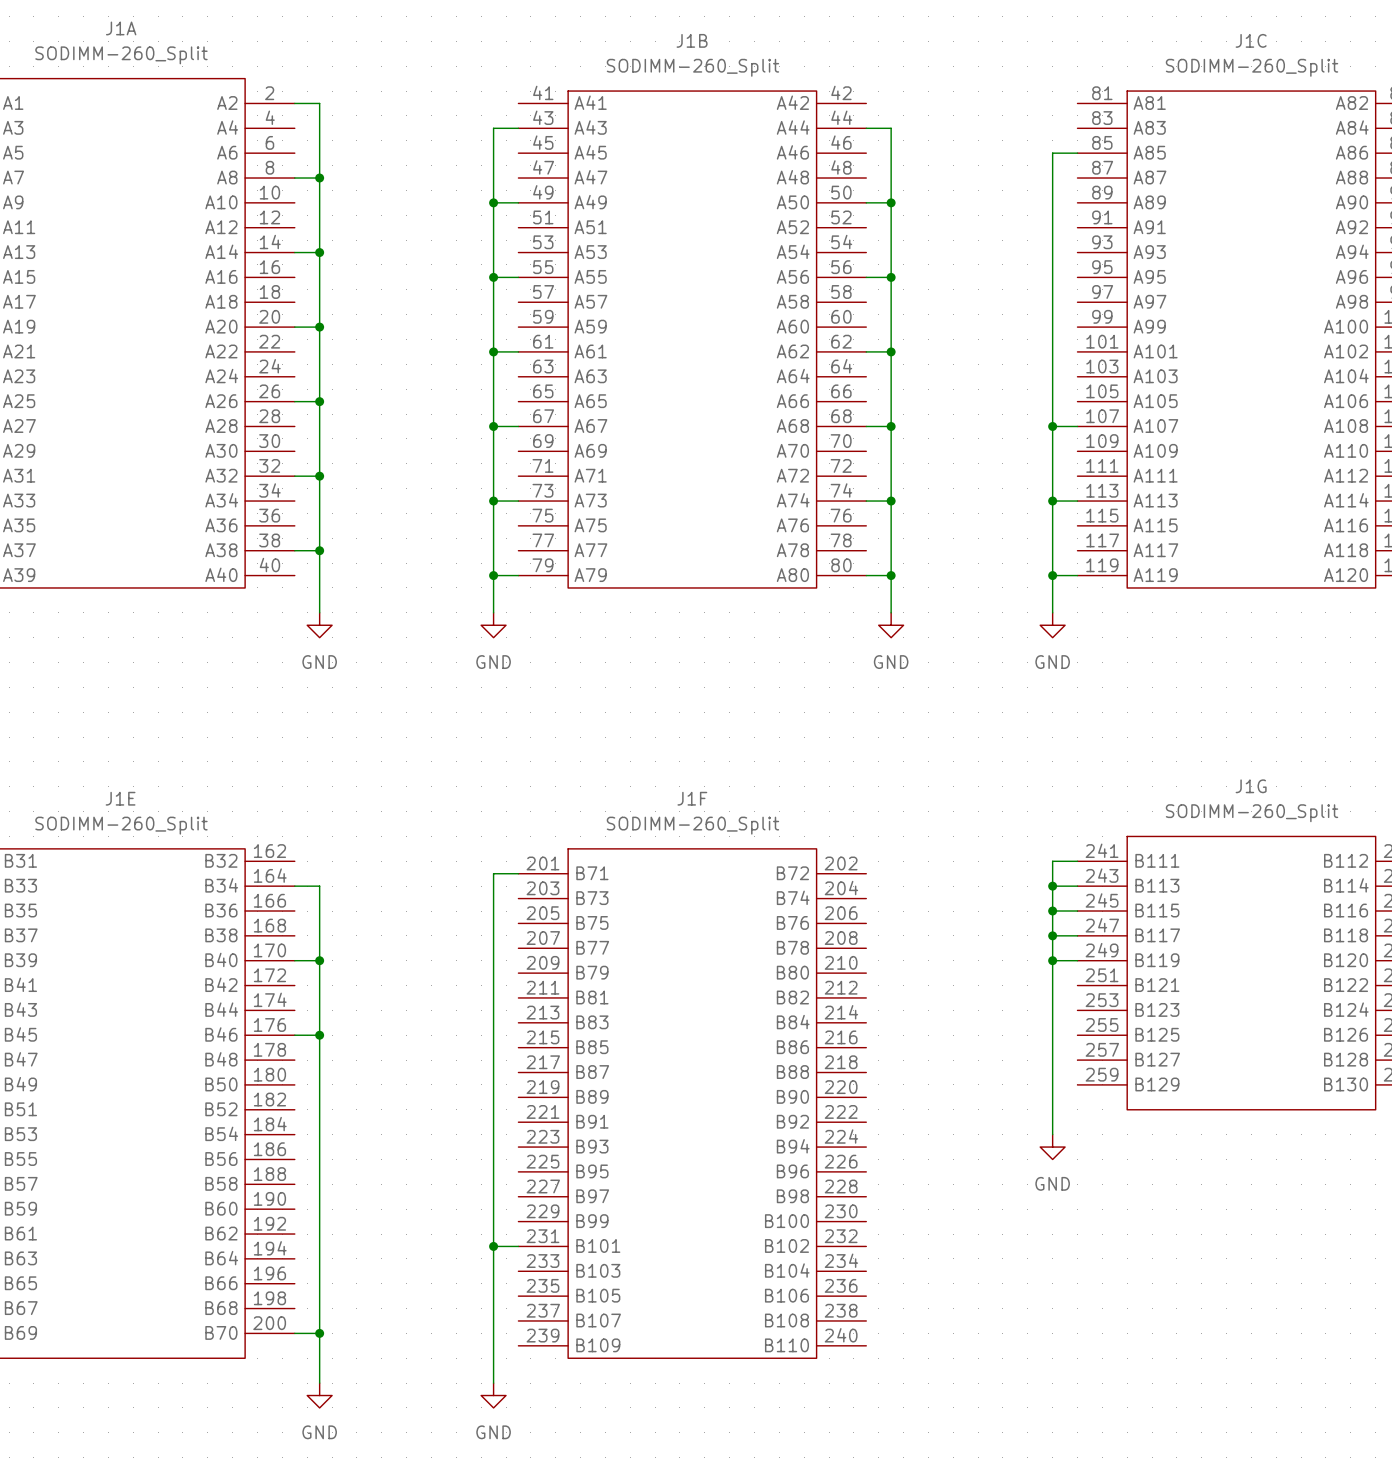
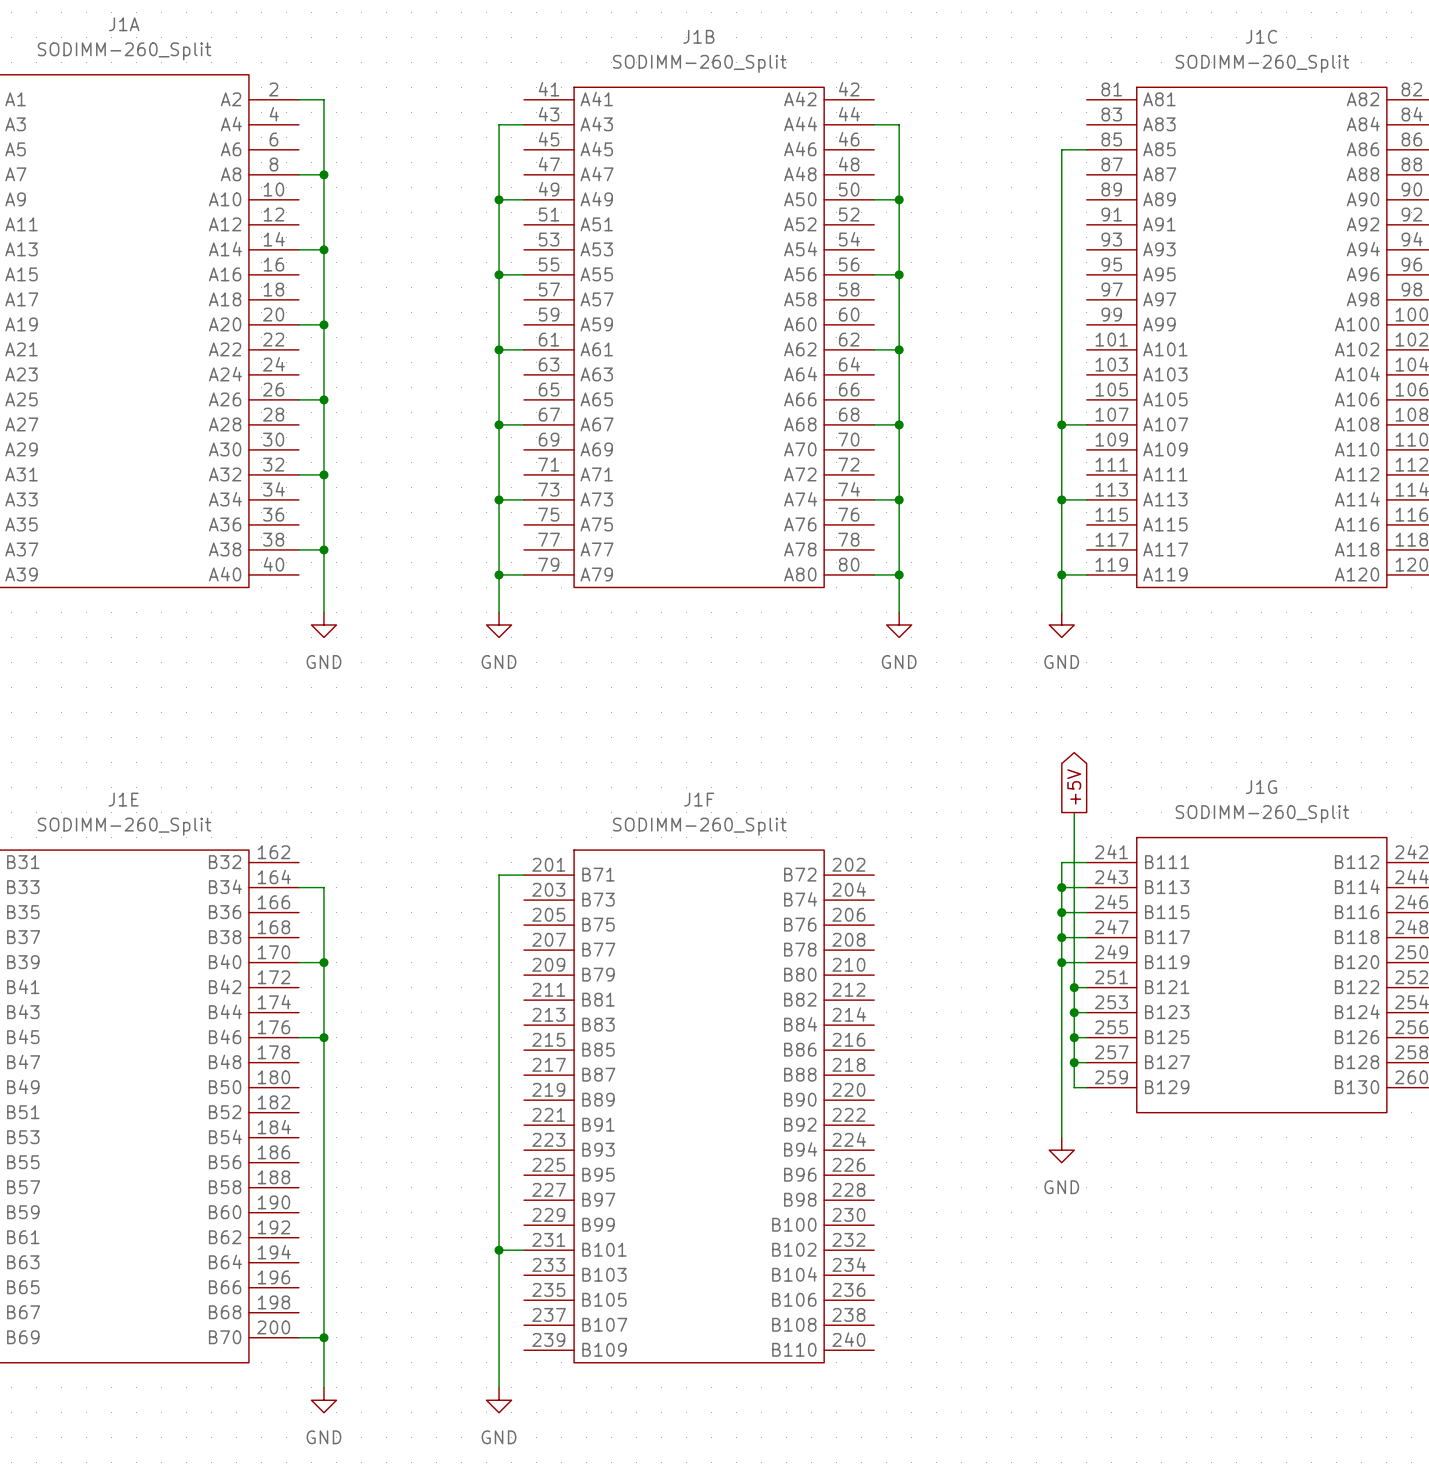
global label: none -> +5V (1074, 786)
wire: none -> (1074, 812) (1074, 1087) (1086, 1087)
wire: none -> (1074, 987) (1086, 987)
junction: none -> (1074, 987)
wire: none -> (1074, 1012) (1086, 1012)
junction: none -> (1074, 1012)
wire: none -> (1074, 1037) (1086, 1037)
junction: none -> (1074, 1037)
wire: none -> (1074, 1062) (1086, 1062)
junction: none -> (1074, 1062)

